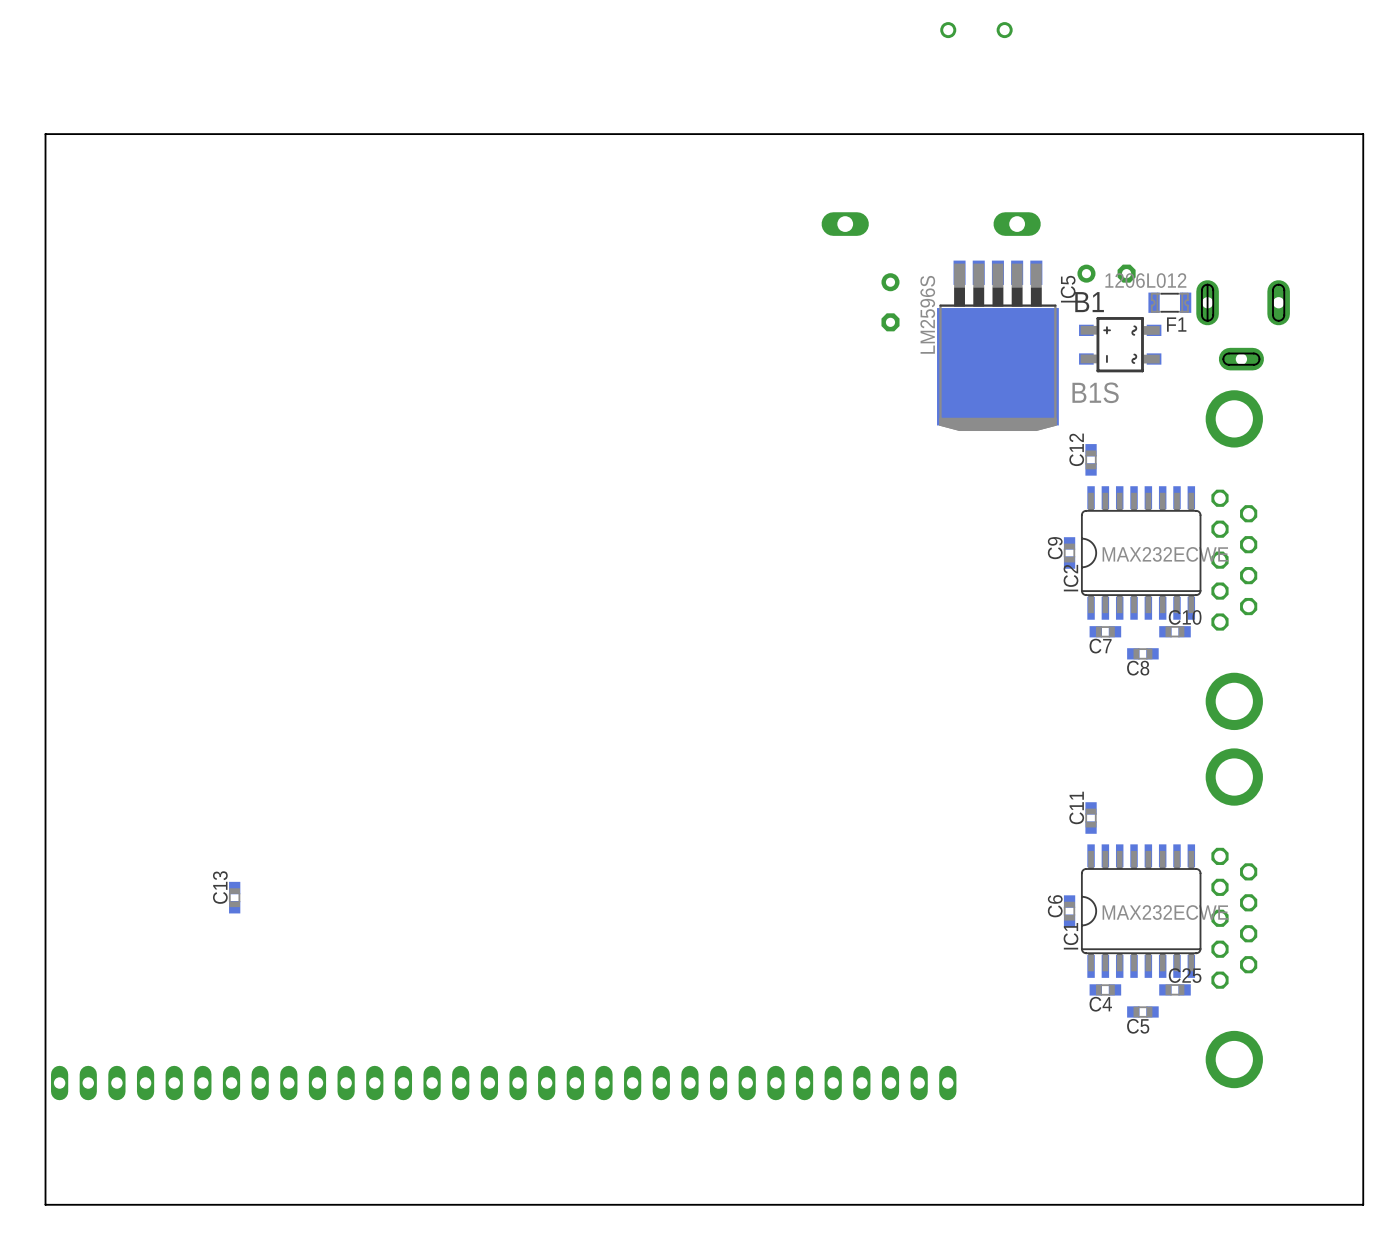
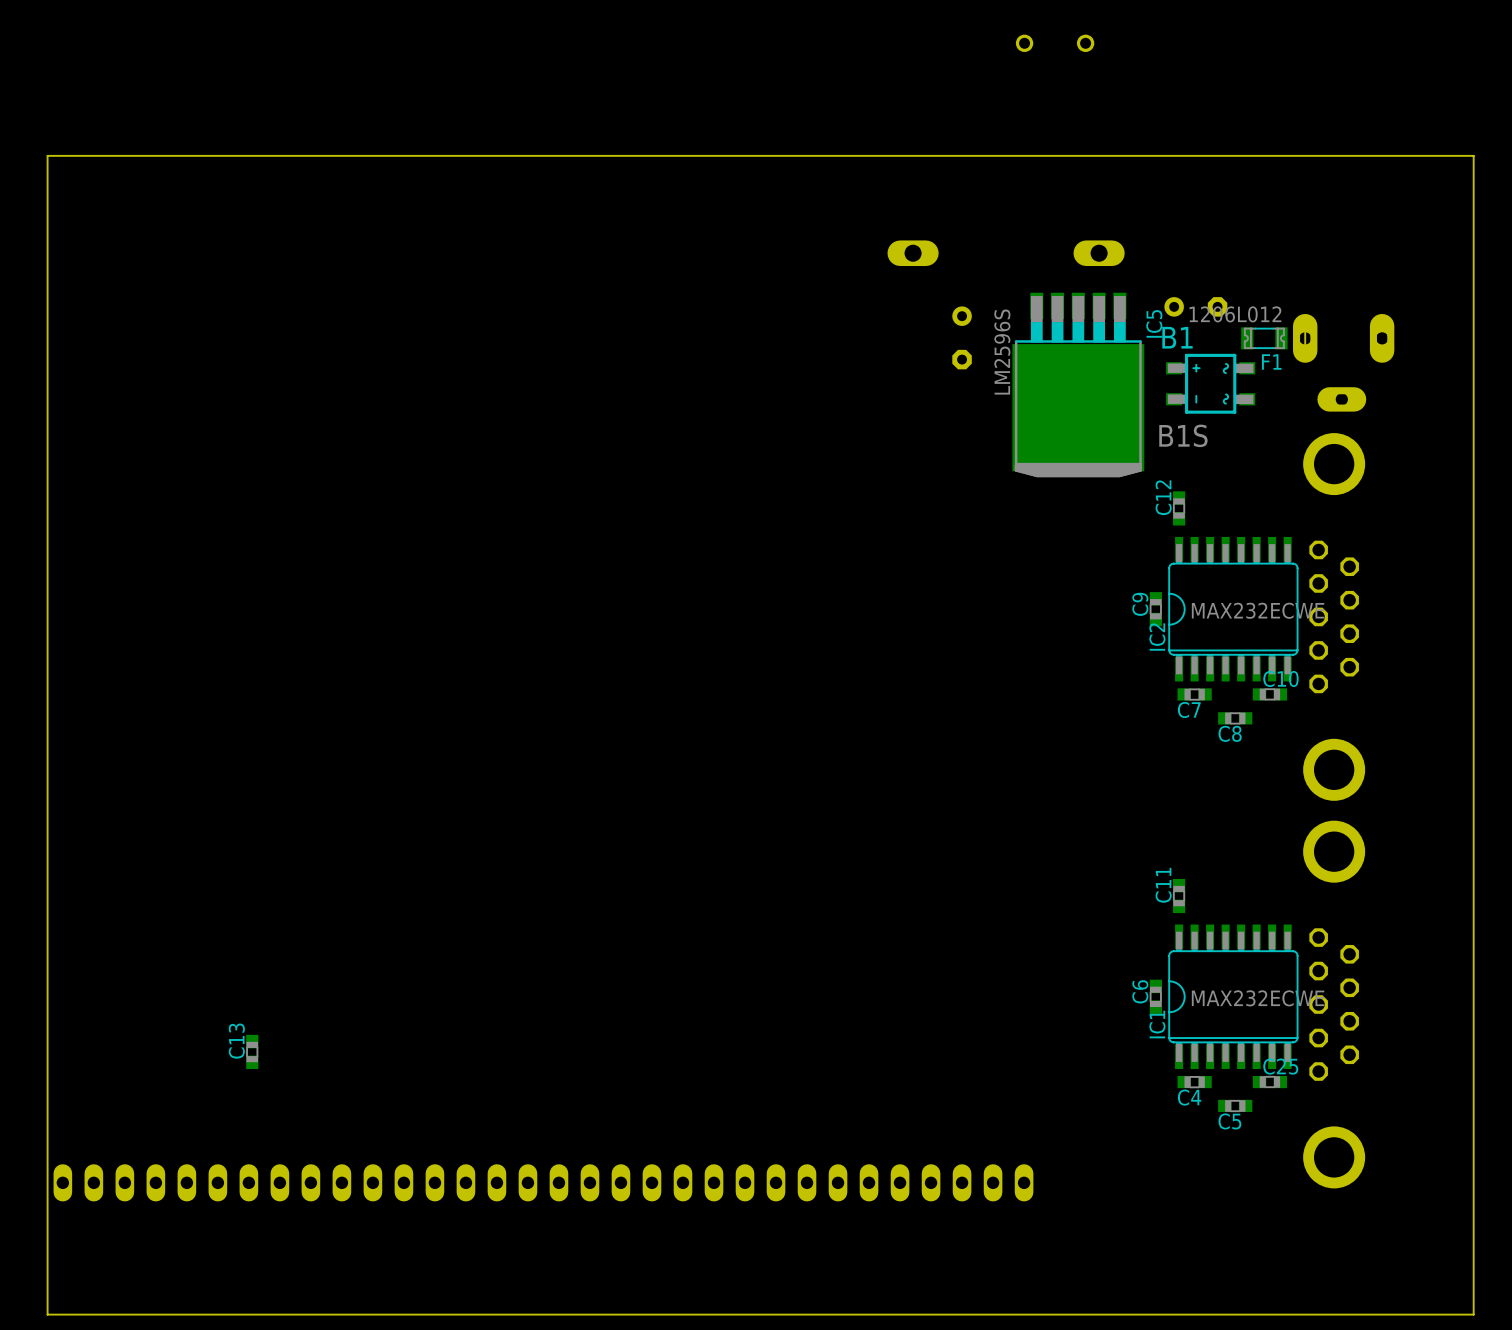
C13 position: (234, 897) -> (252, 1051)

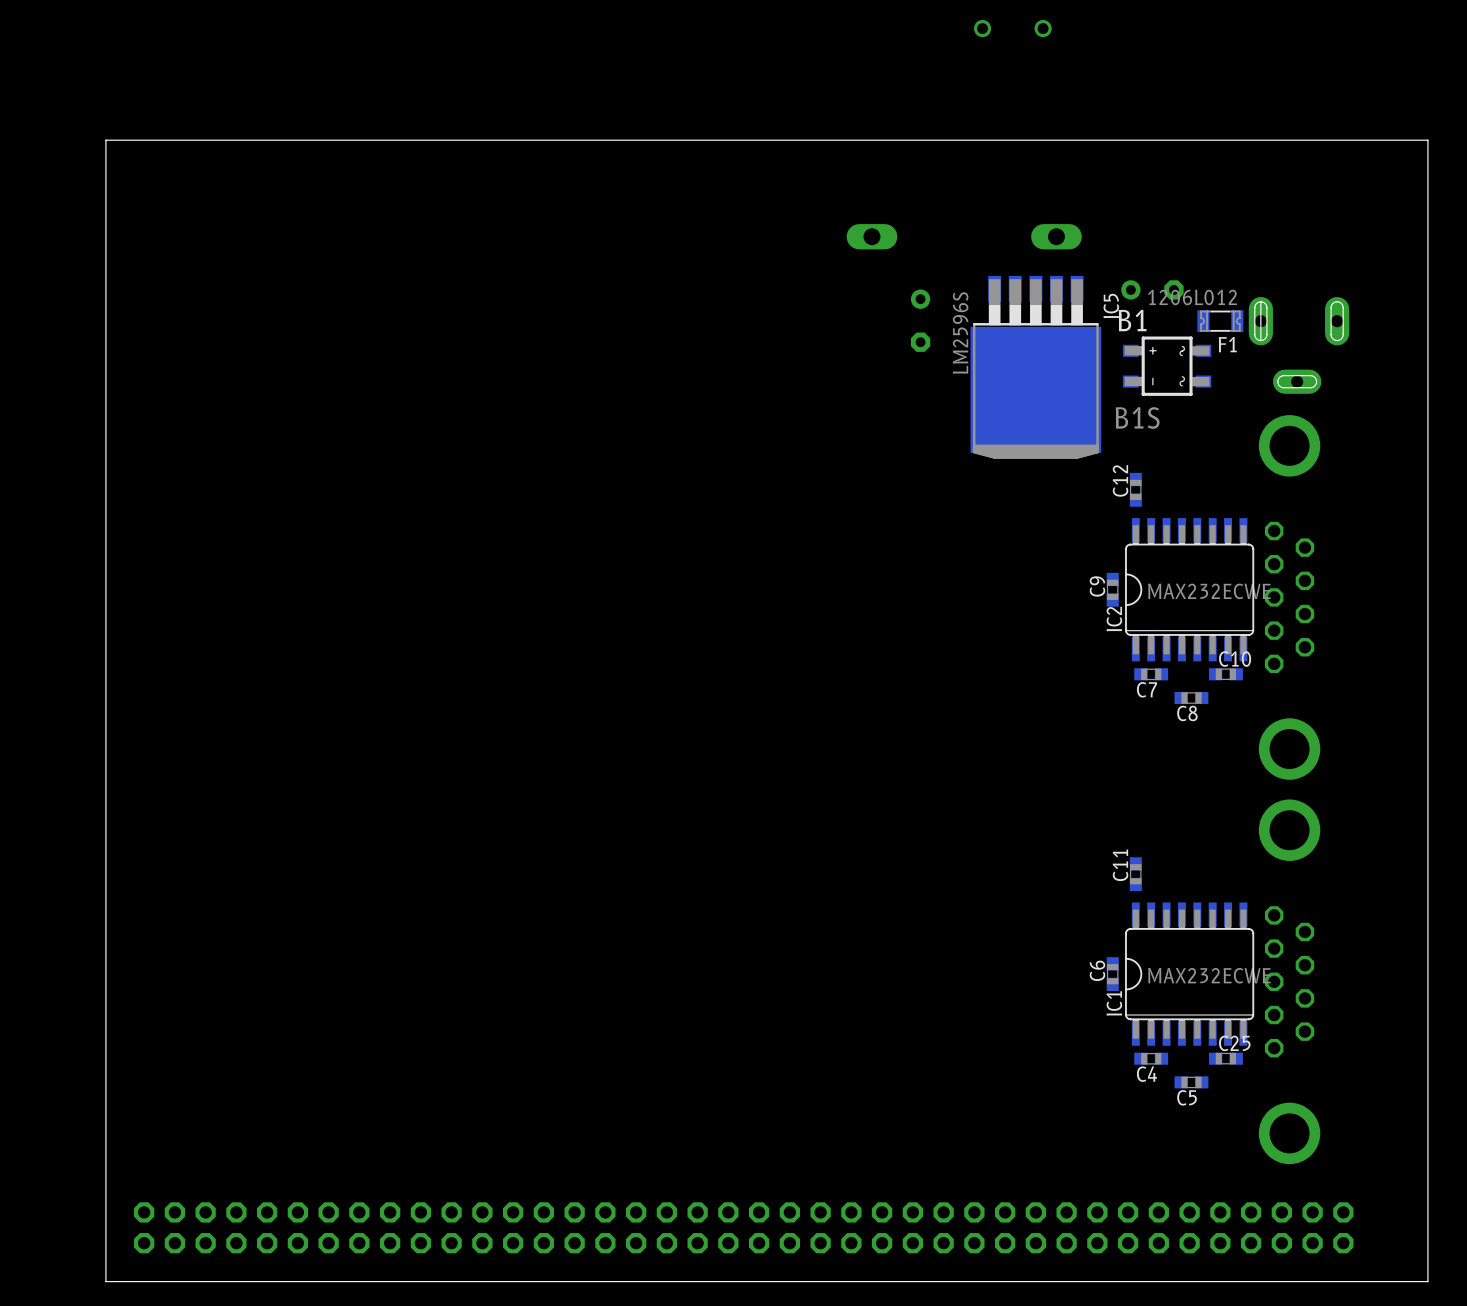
board edge: (140, 155) (47, 155) (47, 1314) (1473, 1314) (1473, 1306) -> (105, 140) (105, 1281) (1427, 1281)
C13: (252, 1051) -> none
part: (357, 1182) -> none
part: (853, 1182) -> none
part: none -> (743, 1227)

